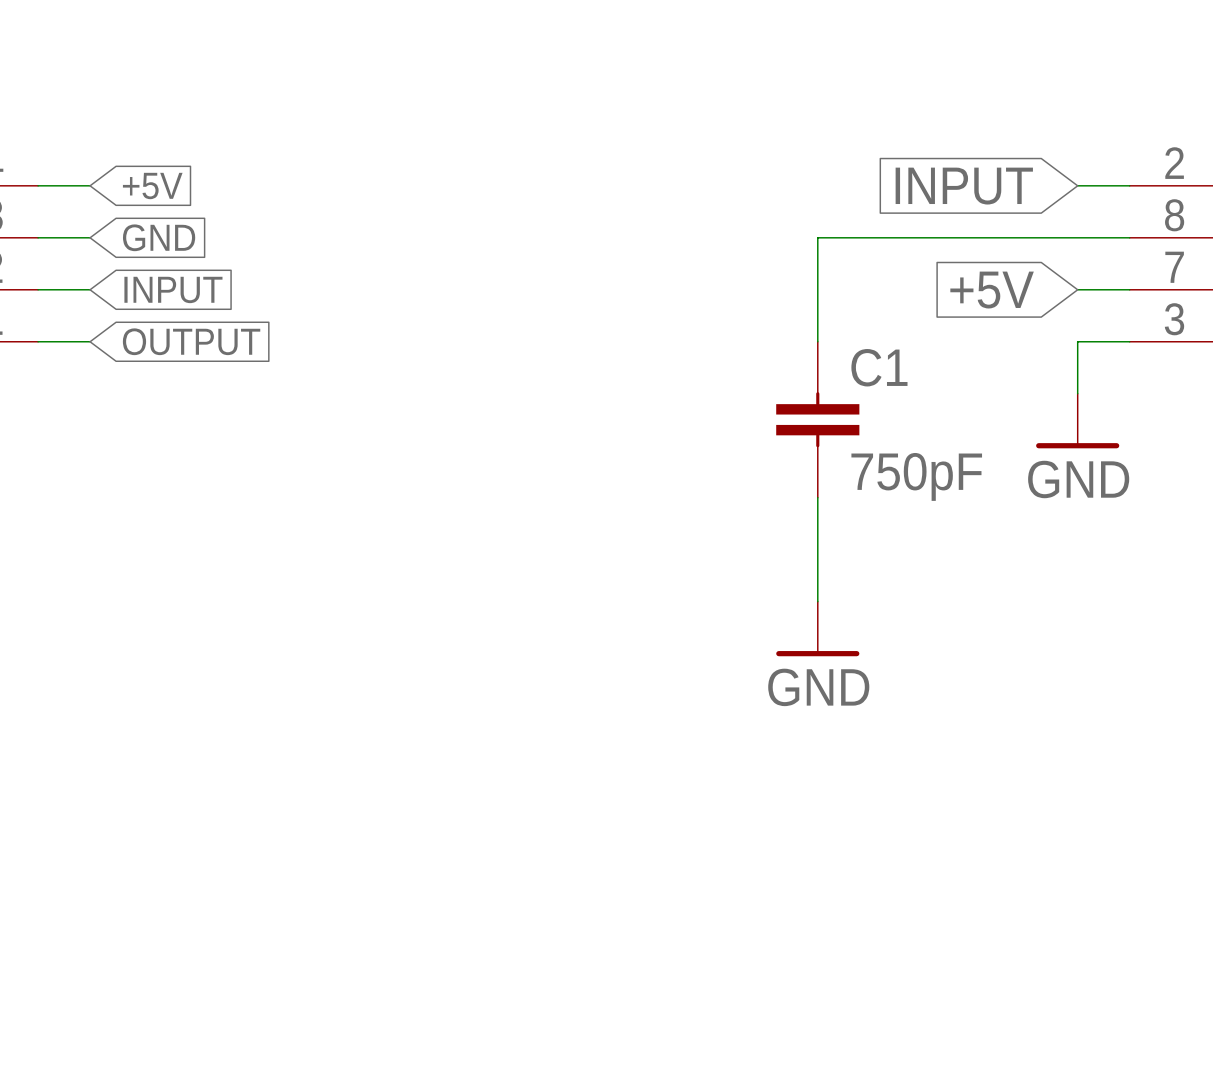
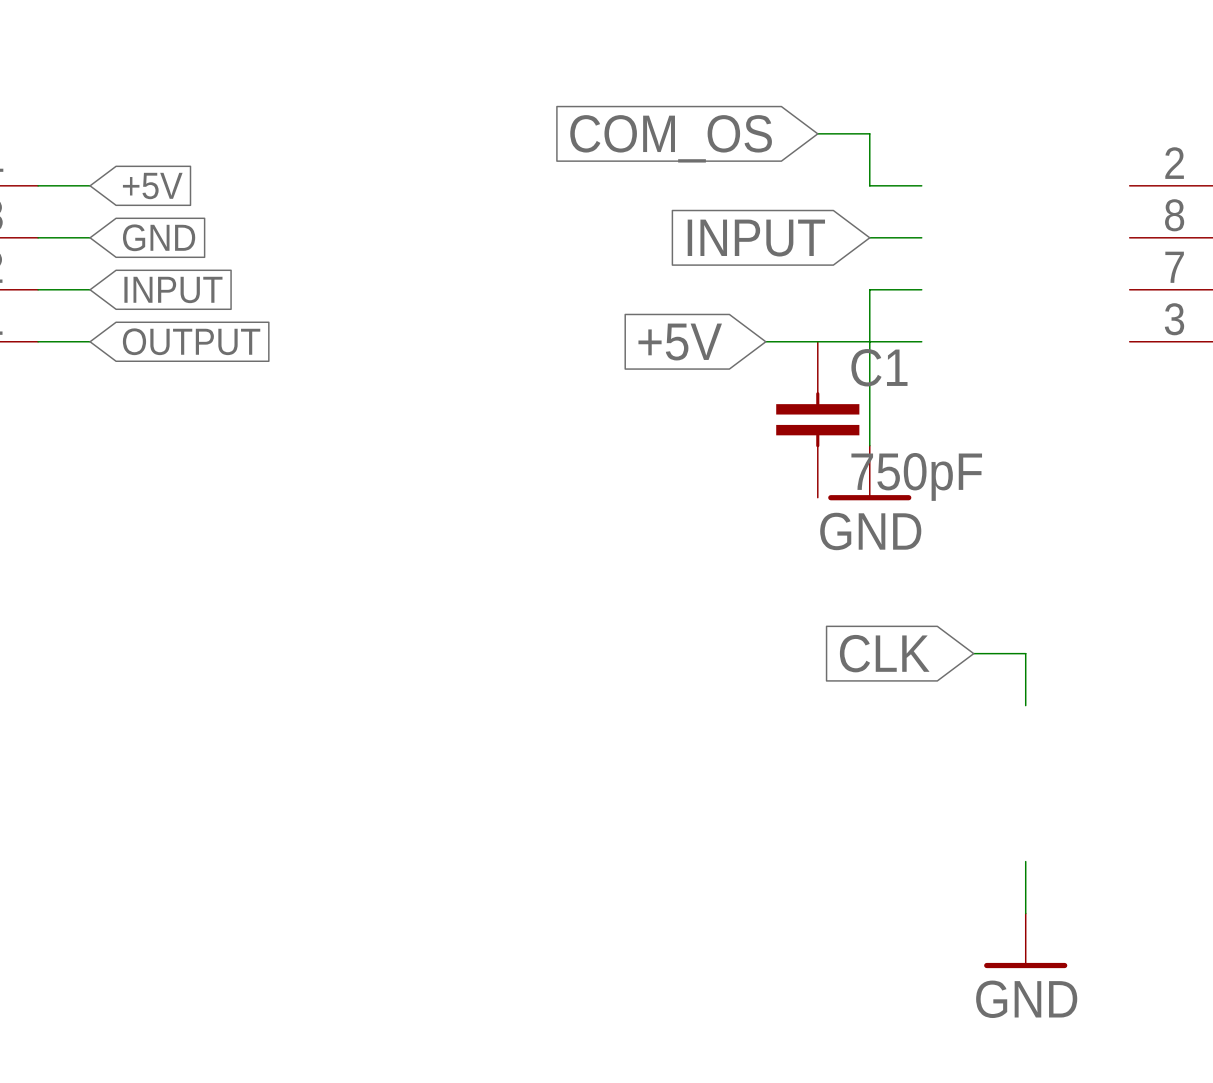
wire: none -> (817, 133) (869, 133) (869, 185) (921, 185)
global label: none -> COM_OS (671, 138)
wire: (1077, 185) (1129, 185) -> none
global label position: INPUT (964, 186) -> INPUT (756, 238)
wire: (869, 237) (817, 237) (817, 341) -> none
wire: (921, 237) (1129, 237) -> none
wire: none -> (921, 289) (869, 289) (869, 445)
wire: (1077, 289) (1129, 289) -> none
global label position: +5V (992, 290) -> +5V (680, 342)
wire: none -> (765, 341) (921, 341)
wire: (1129, 341) (1077, 341) (1077, 393) -> none
power symbol: GND (1077, 421) -> none
power symbol: none -> GND (869, 473)
wire: (817, 497) (817, 601) -> none
power symbol: GND (817, 628) -> none
global label: none -> CLK (884, 653)
wire: none -> (973, 653) (1025, 653) (1025, 705)
wire: none -> (1025, 861) (1025, 913)
power symbol: none -> GND (1025, 940)

